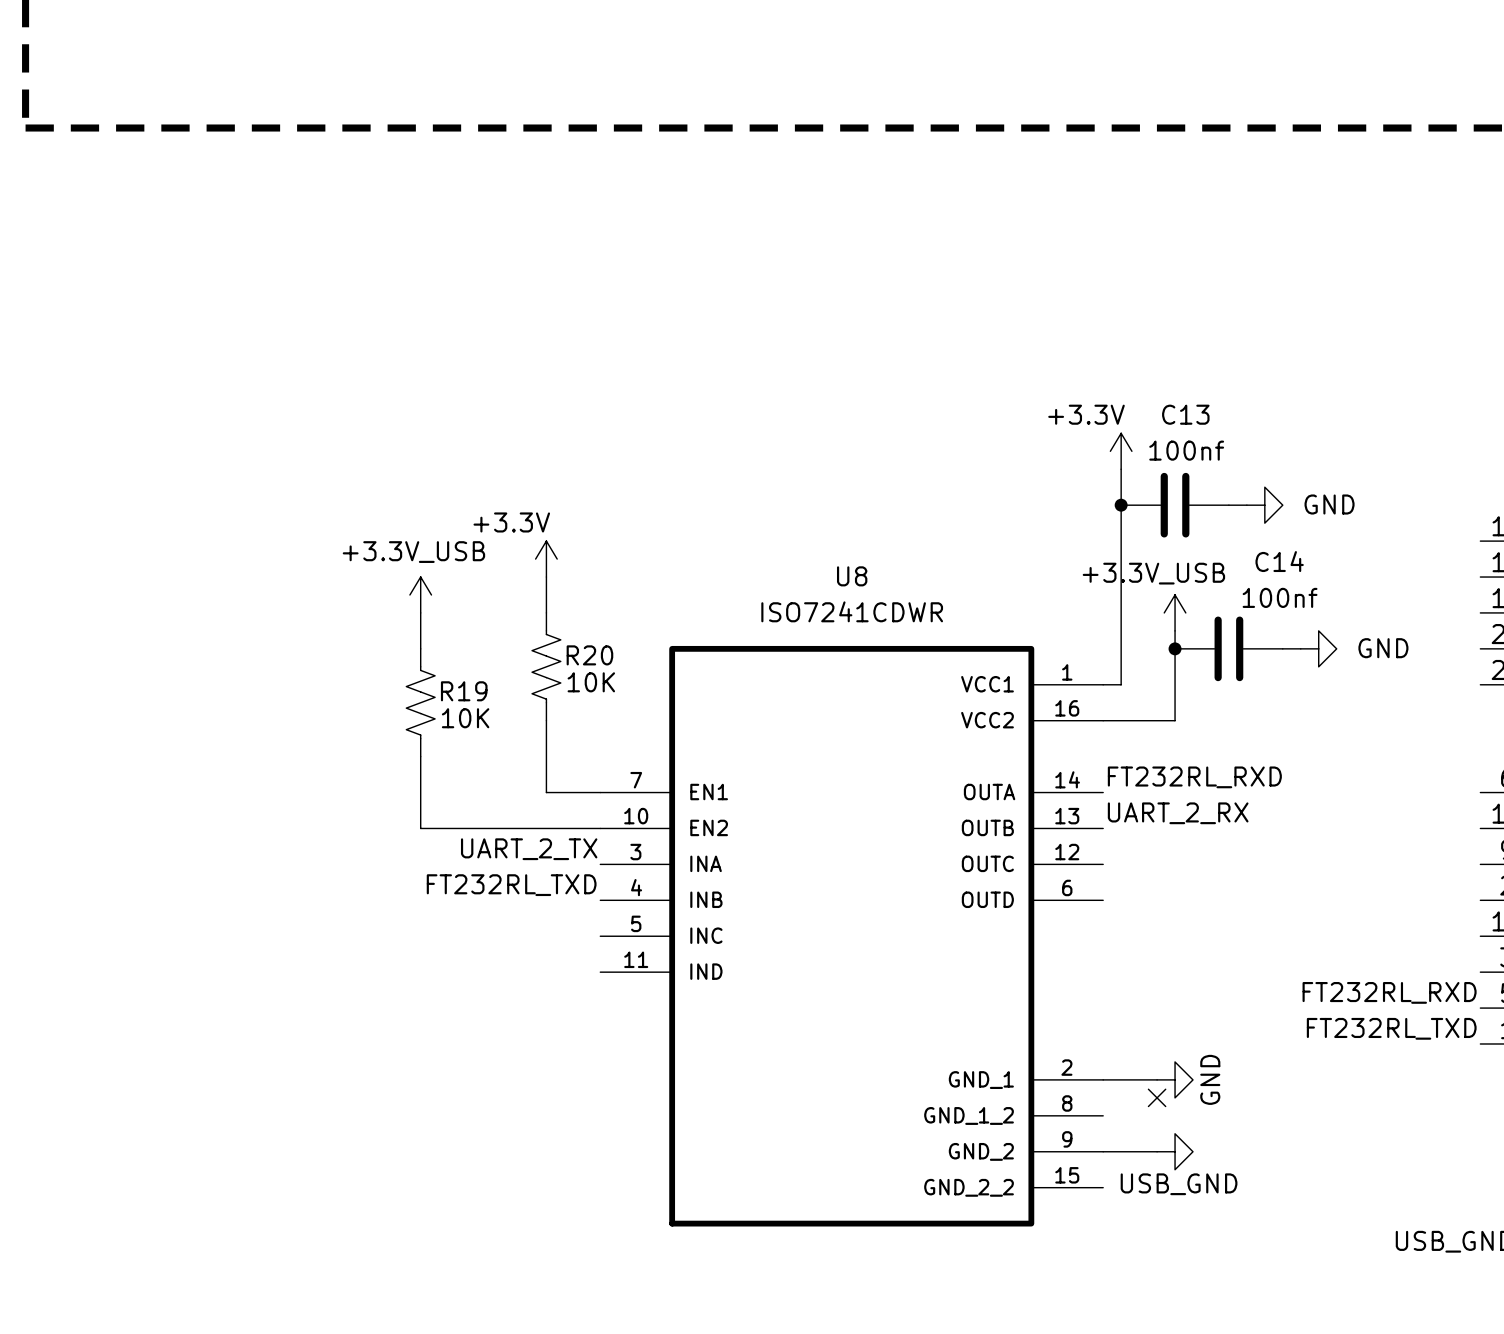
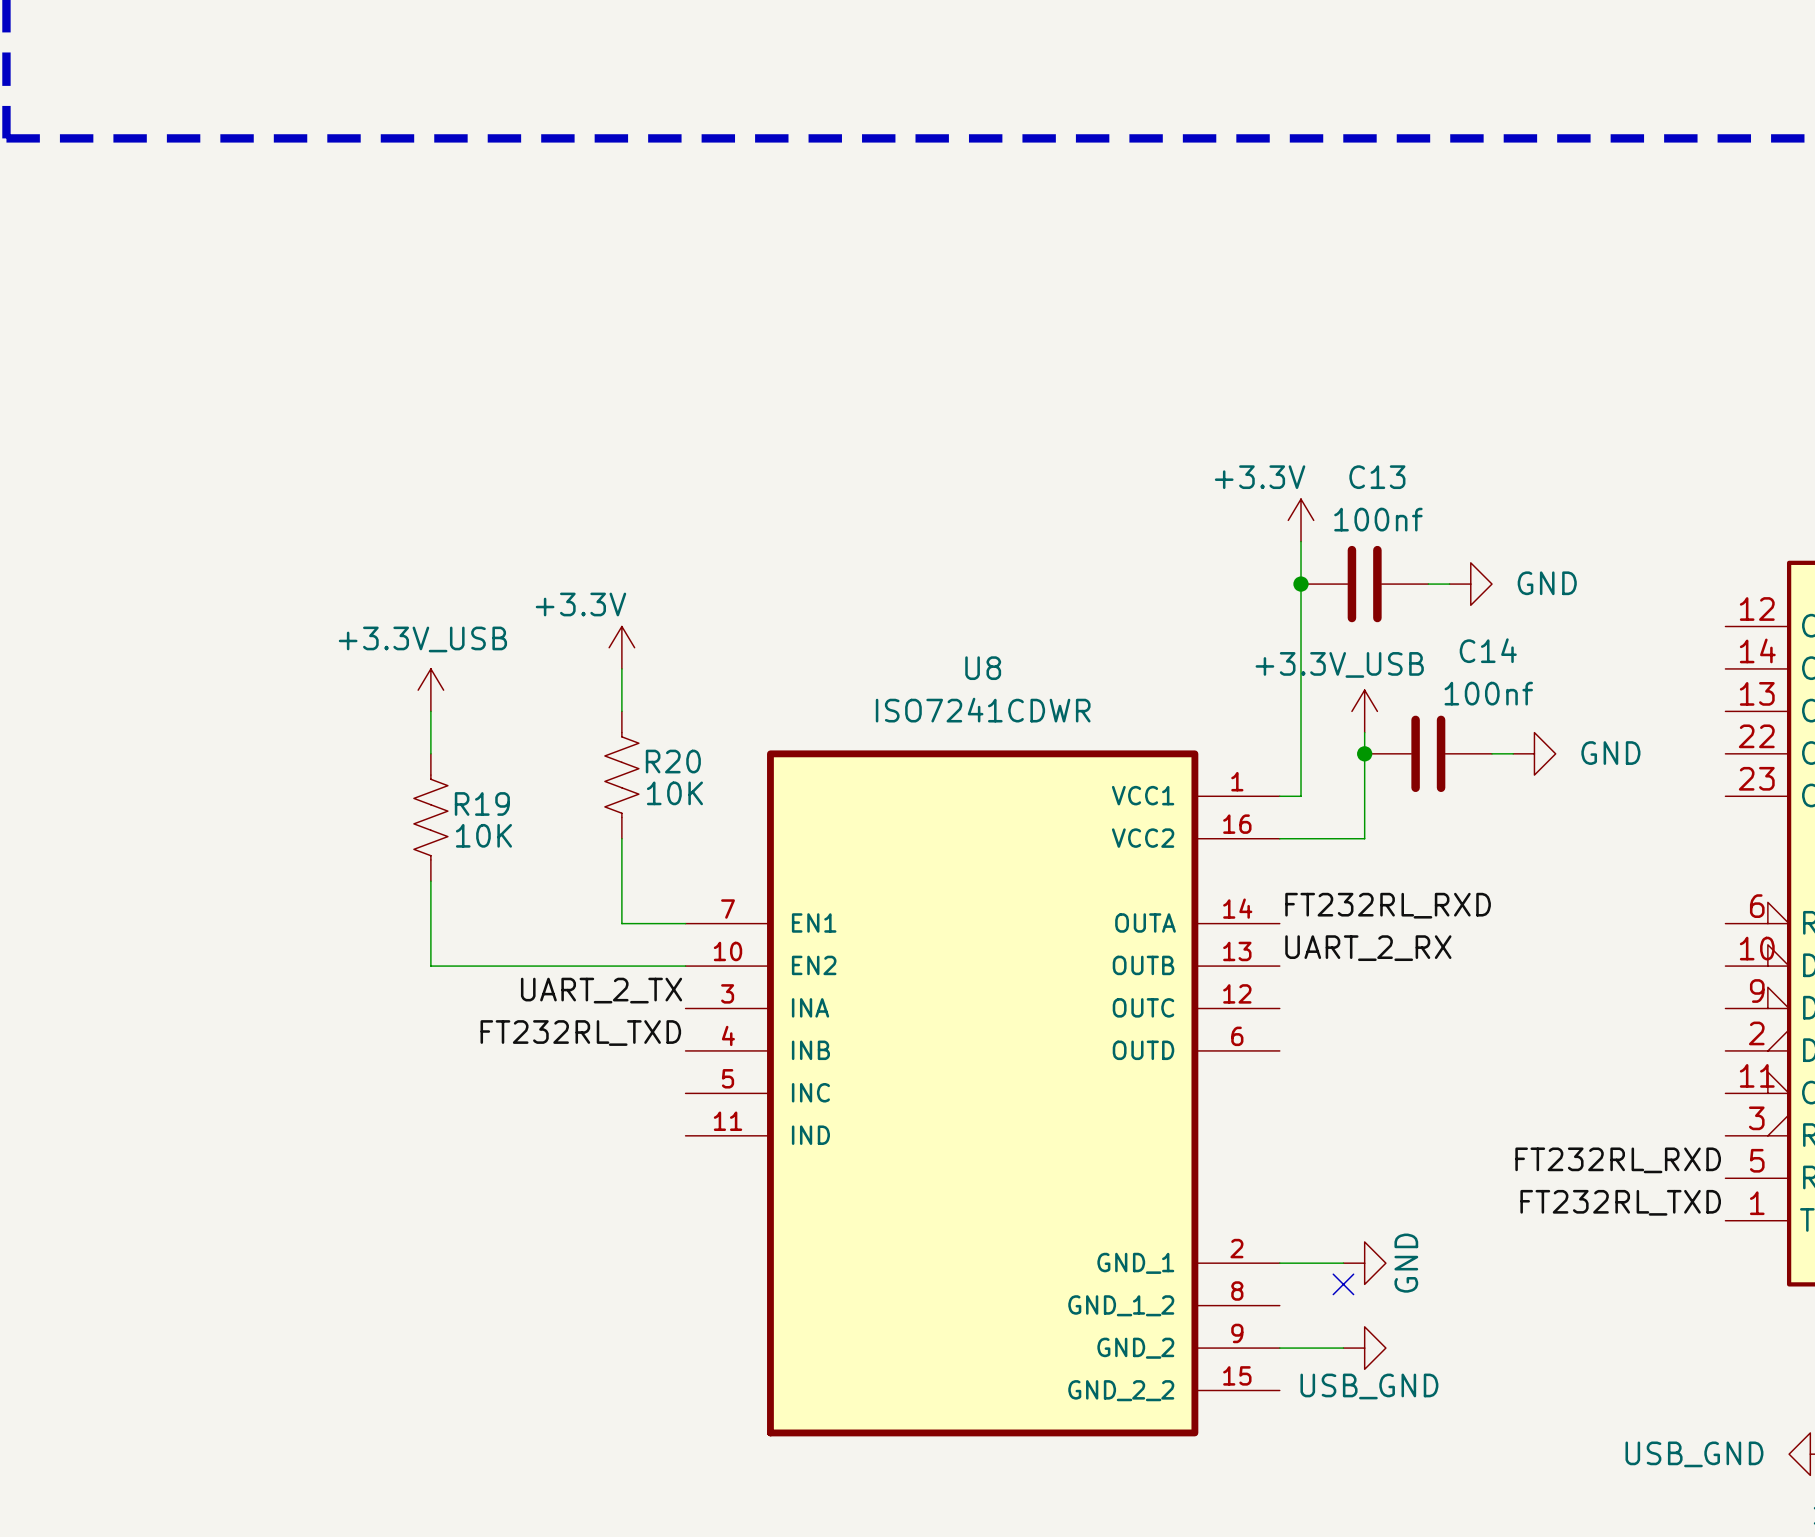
power symbol position: +3.3V_USB (420, 594) -> +3.3V_USB (430, 690)
wire: (420, 612) (420, 648) -> (430, 711) (430, 753)
R19 position: (420, 702) -> (430, 817)
wire: (420, 756) (420, 828) -> (430, 881) (430, 966) (473, 966)

